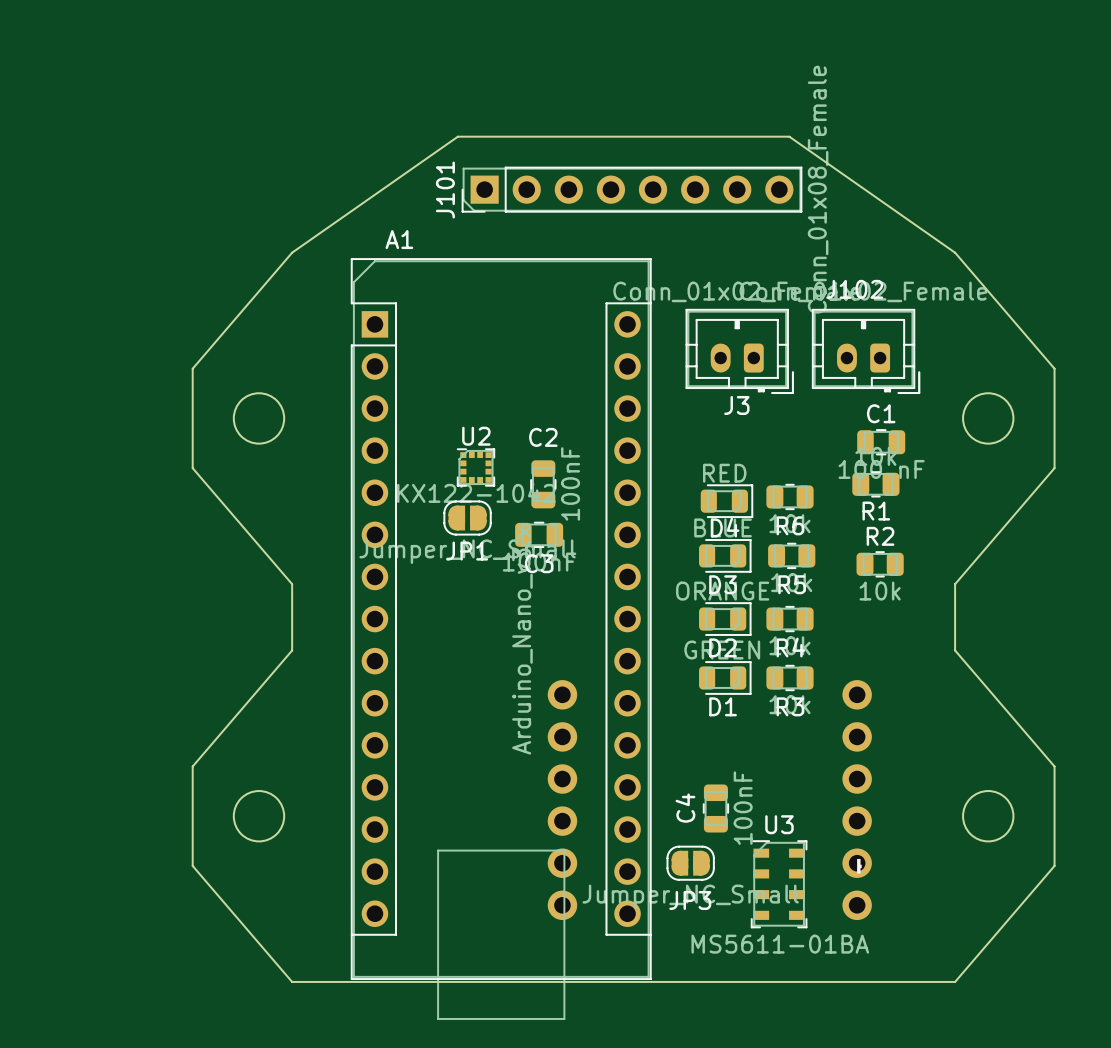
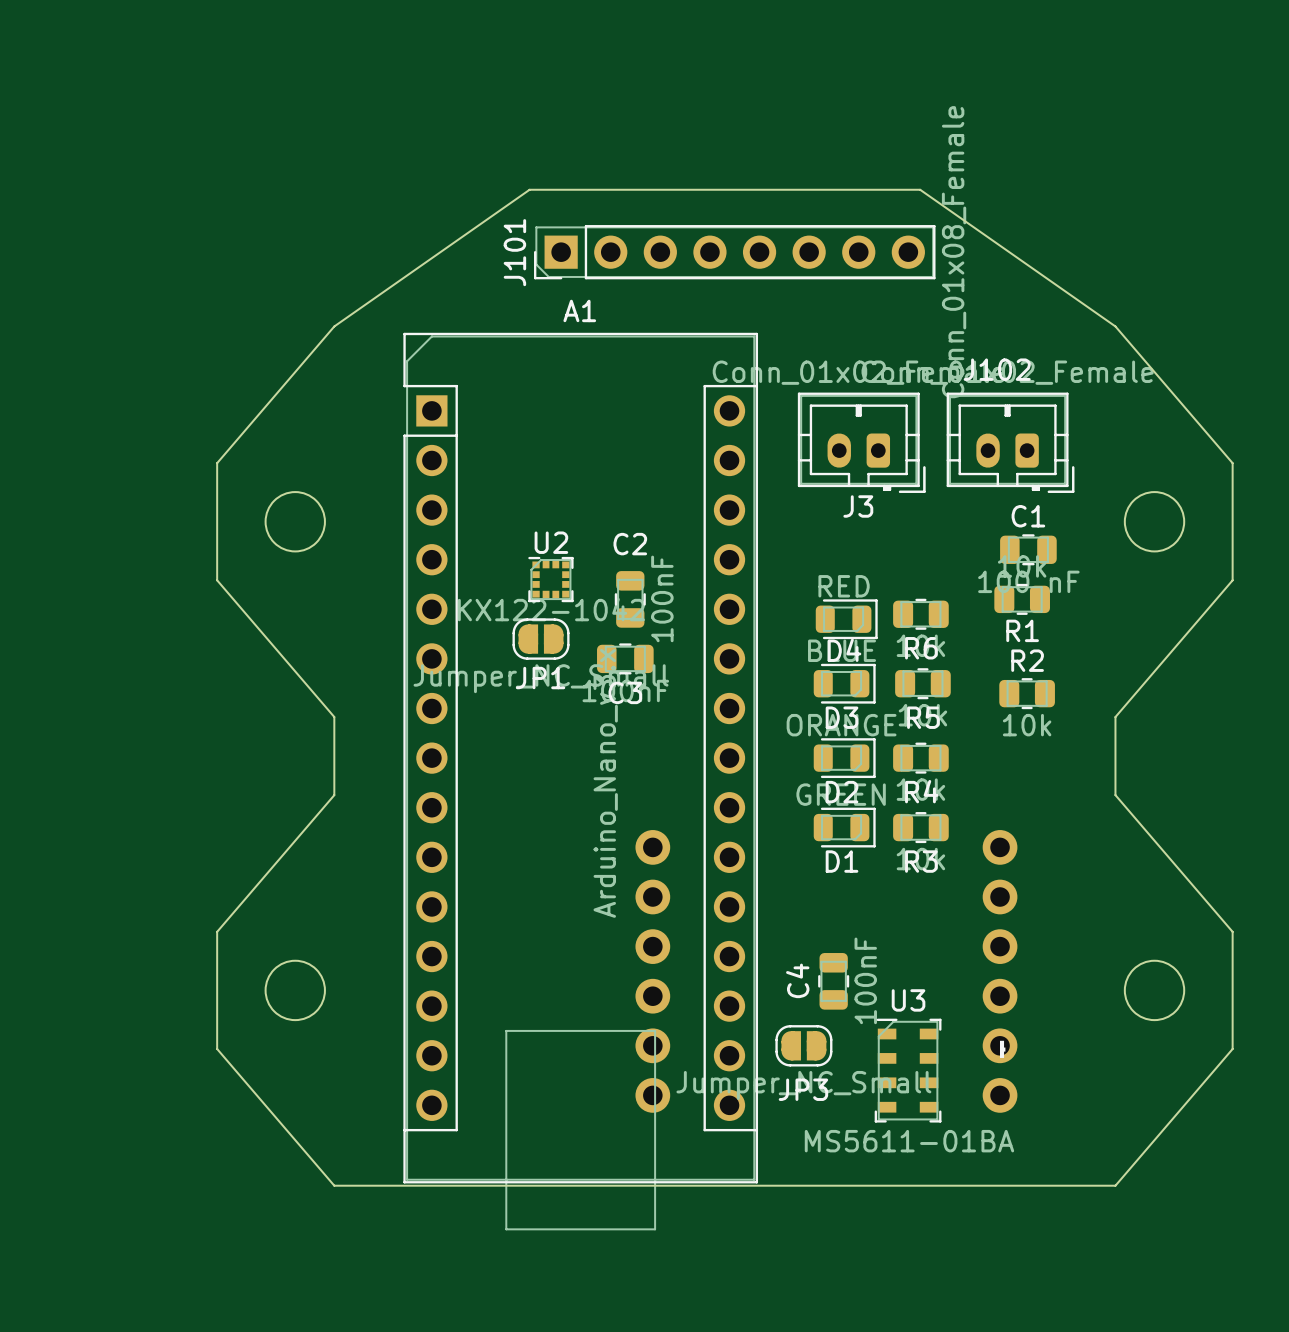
A1 name position: A1 (399, 239) -> A1 (579, 310)

